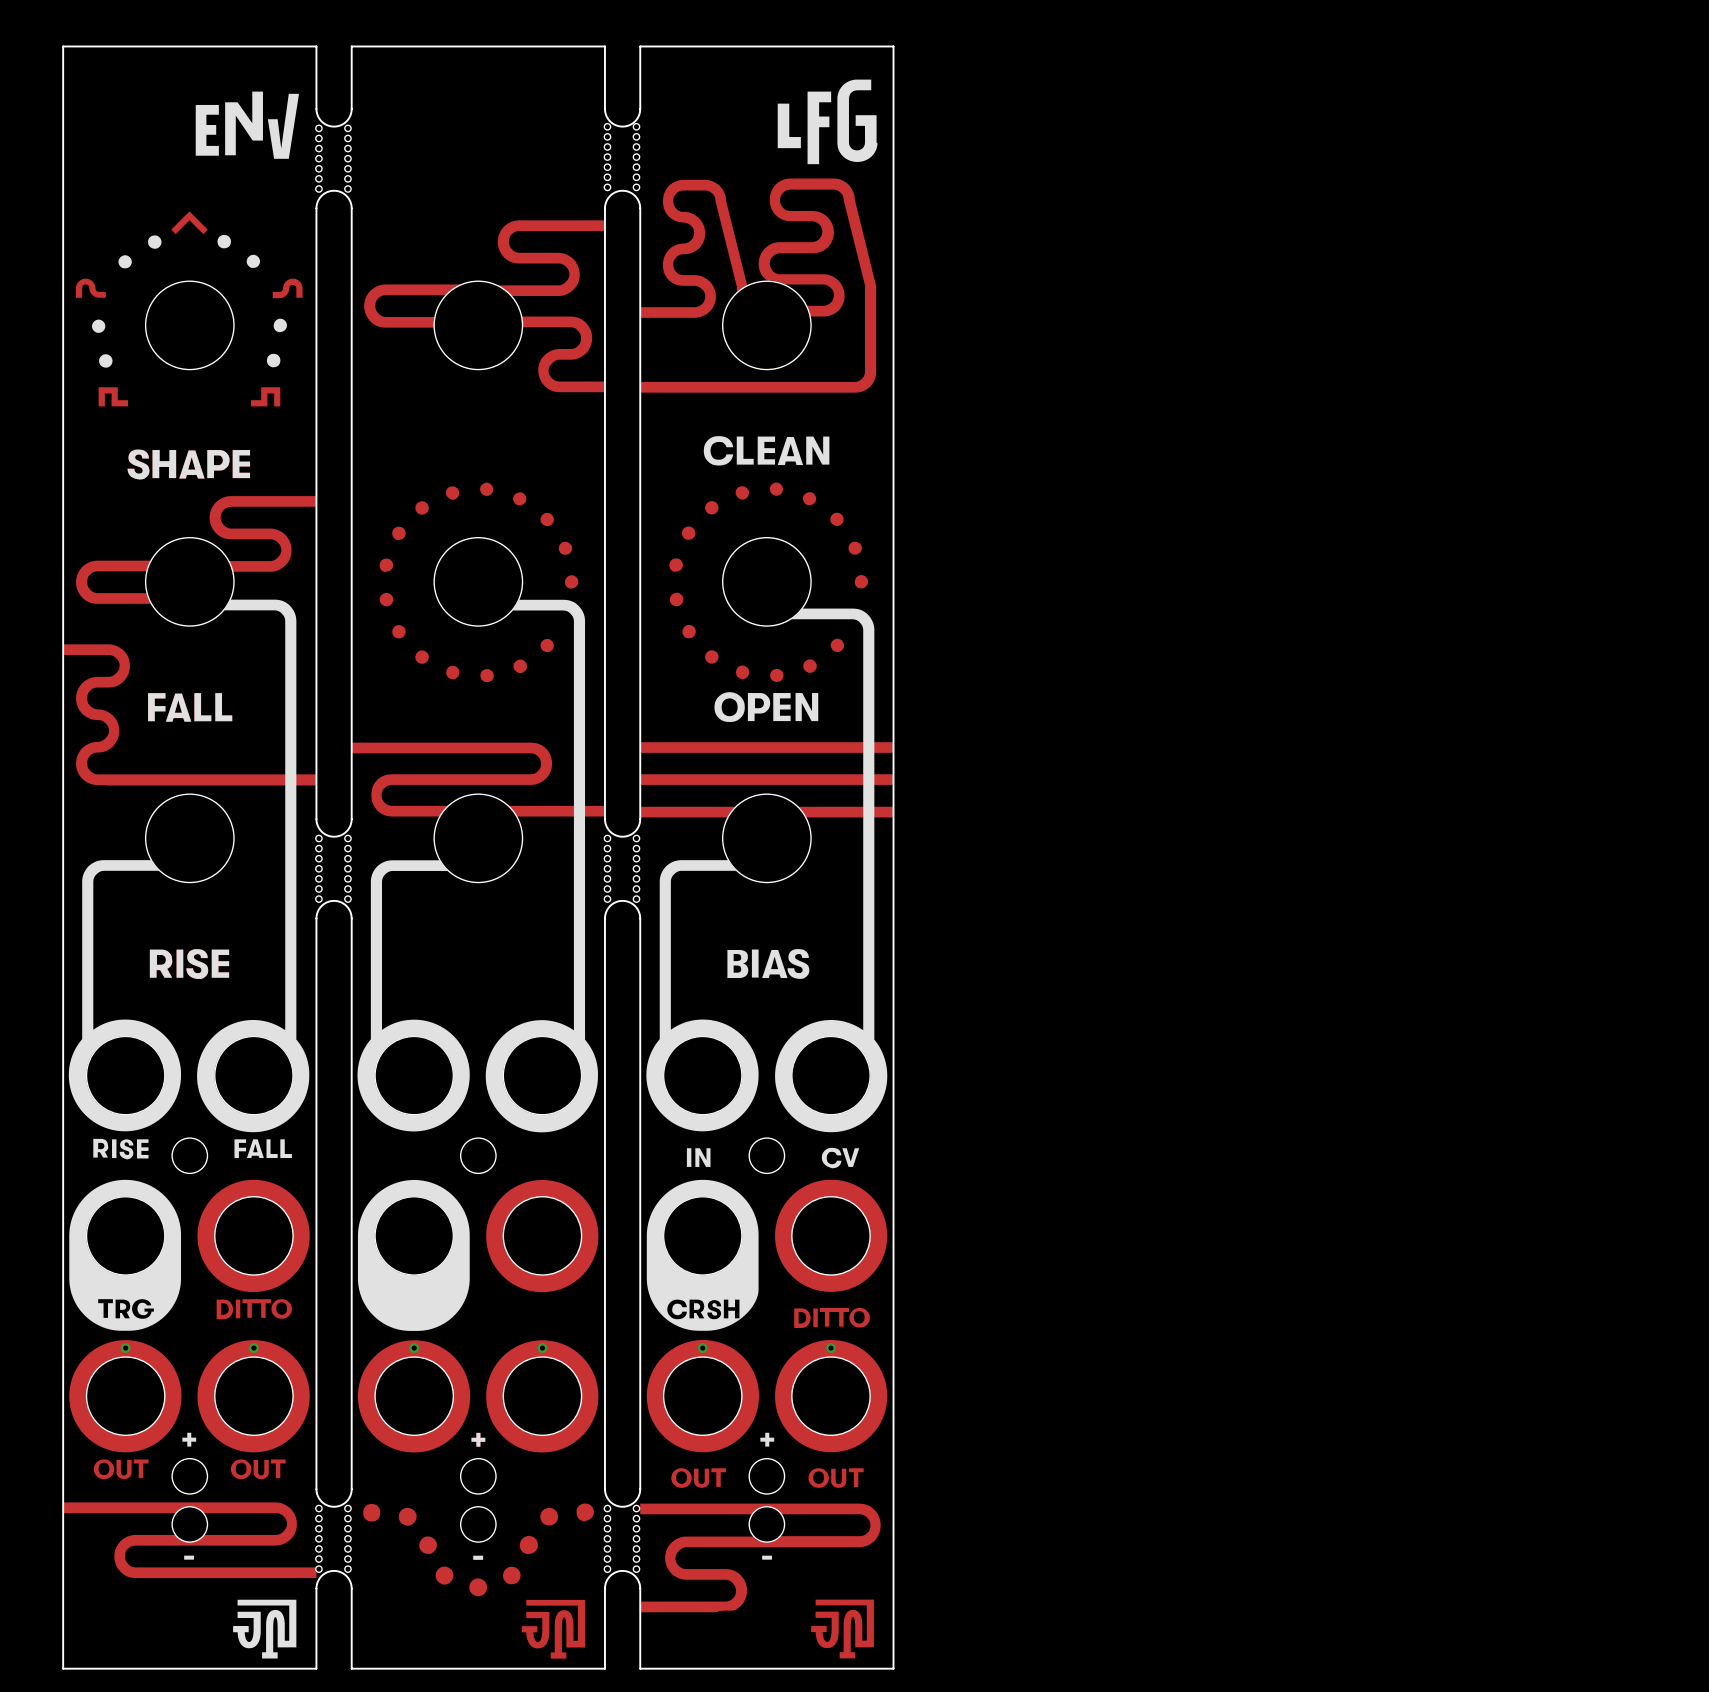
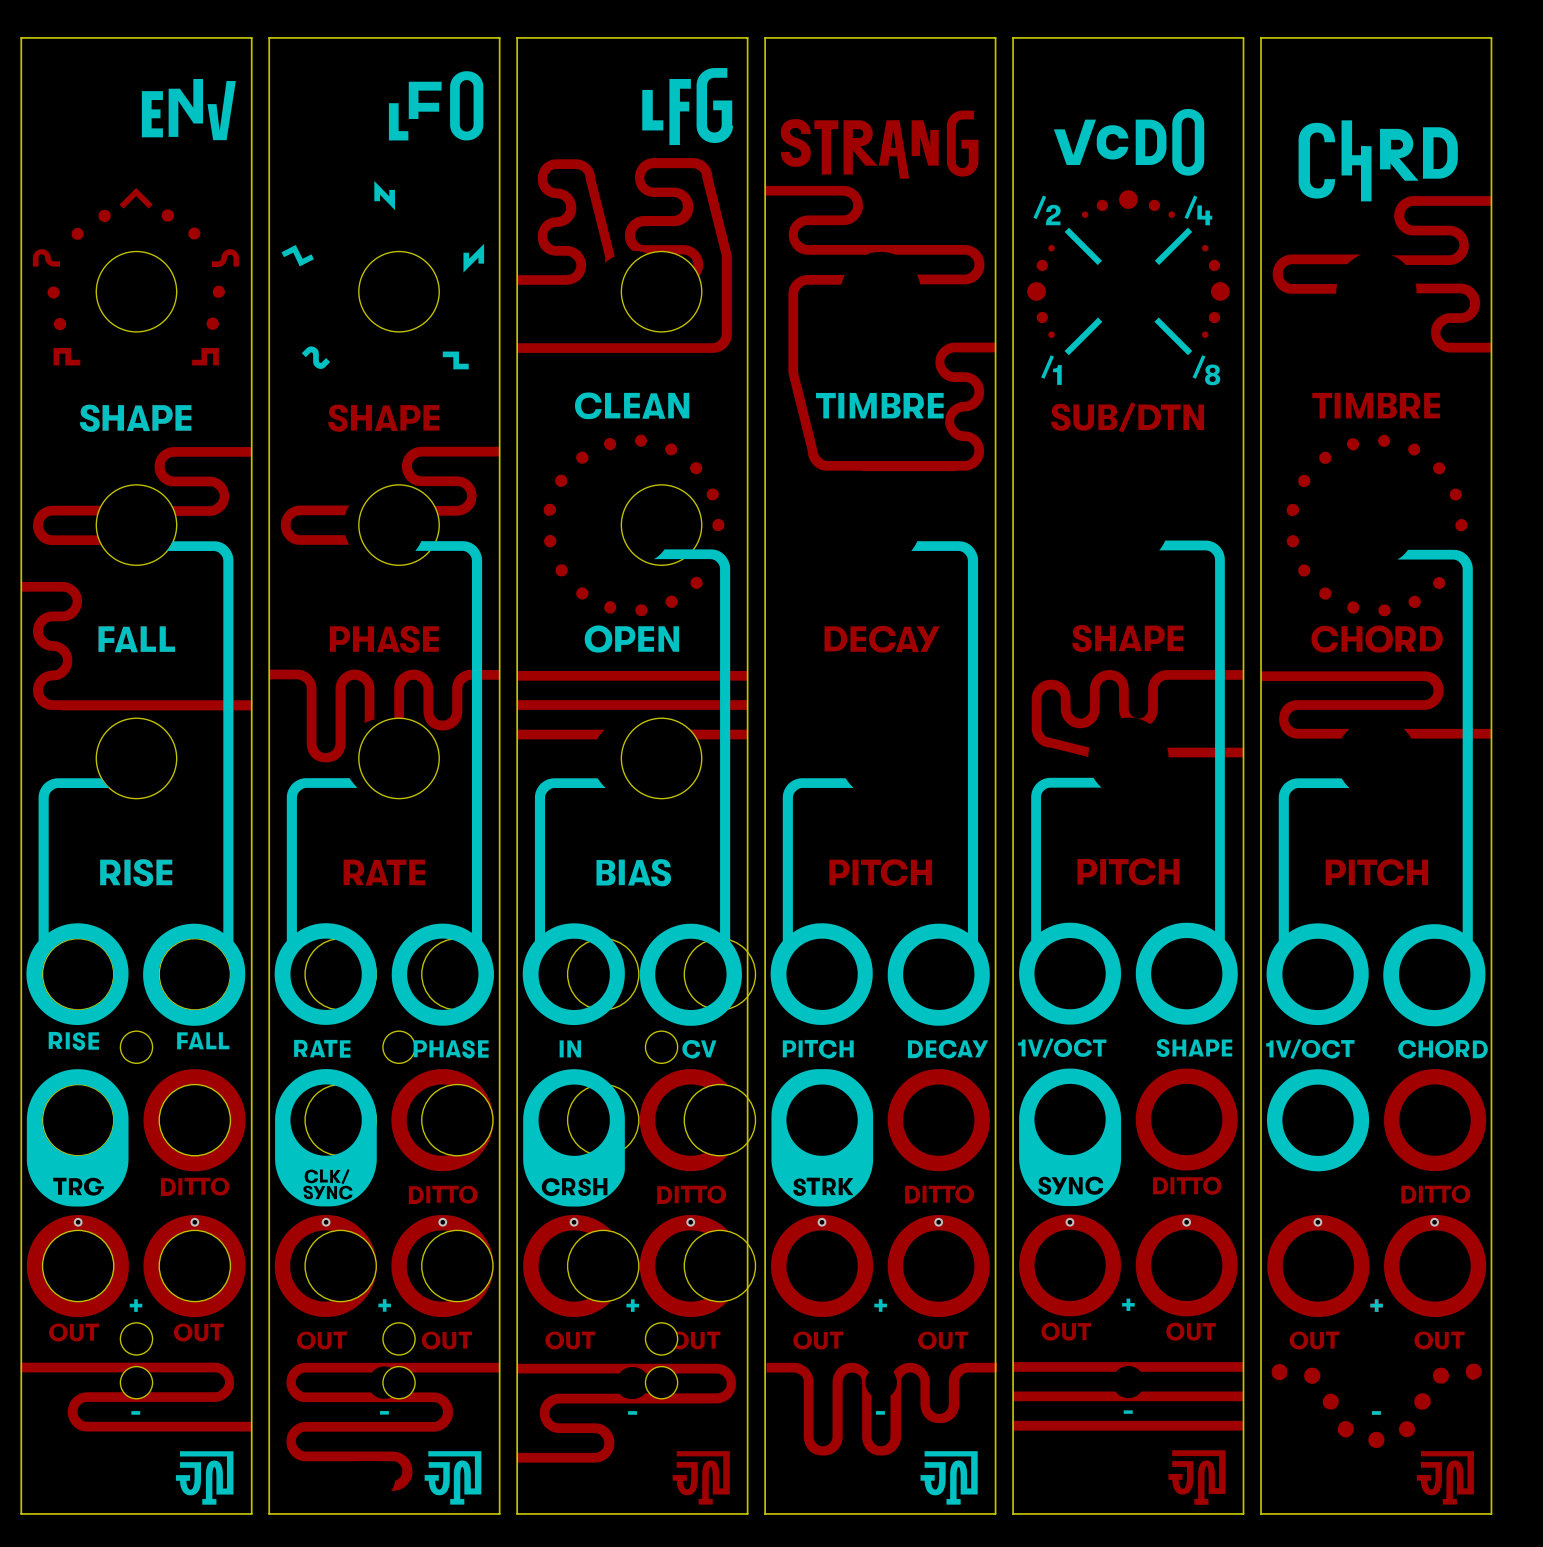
board edge: (351, 46) (351, 108) (349, 117) (340, 125) (329, 126) (320, 119) (316, 108) -> (251, 185) (251, 94)
board edge: none -> (283, 37) (269, 37) (269, 1513) (283, 1513)
board edge: (588, 46) (604, 46) (605, 113) (611, 122) (622, 126) (633, 122) (639, 113) (640, 46) -> (499, 37) (499, 1513)
board edge: (861, 46) (880, 46) -> (747, 37) (747, 1513)
board edge: (893, 46) (893, 1668) -> (776, 37) (995, 37) (995, 1513) (776, 1513)
board edge: none -> (1013, 37) (1243, 37) (1243, 1513) (1013, 1513) (1013, 37)
board edge: none -> (1261, 37) (1491, 37) (1491, 1513) (1261, 1513) (1261, 37)
drawing: none -> [269, 71, 500, 1505]
drawing shape: [62, 91, 317, 1659] -> [20, 78, 253, 1505]
drawing: none -> [1013, 108, 1244, 1505]
drawing: none -> [765, 110, 998, 1505]
drawing: none -> [1260, 120, 1492, 1505]
part: (621, 157) -> none
part: (333, 158) -> none
board edge: (316, 208) (321, 195) (334, 190) (346, 195) (351, 208) (351, 819) (346, 831) (334, 836) (321, 831) (316, 819) -> none
board edge: (604, 208) (604, 819) (610, 831) (622, 836) (635, 831) (640, 819) (640, 208) (635, 195) (622, 190) (610, 195) (604, 208) -> none
drawing: [351, 220, 606, 1659] -> none
part: (333, 868) -> none
part: (621, 868) -> none
drawing position: (766, 868) -> (632, 786)
board edge: (316, 918) (321, 906) (334, 900) (346, 906) (351, 918) (351, 1489) (346, 1501) (334, 1506) (321, 1501) (316, 1489) -> (251, 831) (251, 740)
board edge: (604, 918) (604, 1489) (610, 1501) (622, 1506) (635, 1501) (640, 1489) (640, 918) (635, 906) (622, 900) (610, 906) (604, 918) -> none
via position: (414, 1348) -> (326, 1222)
via position: (542, 1348) -> (442, 1222)
via position: (702, 1348) -> (574, 1222)
via position: (831, 1348) -> (690, 1222)
via: none -> (822, 1222)
via: none -> (938, 1222)
via: none -> (1069, 1222)
via: none -> (1186, 1222)
via: none -> (1317, 1222)
via: none -> (1434, 1222)
part: (333, 1538) -> none
part: (621, 1538) -> none
board edge: (316, 1588) (320, 1577) (329, 1571) (340, 1572) (350, 1581) (351, 1668) -> (251, 1441) (251, 1350)
board edge: (588, 1668) (604, 1668) (605, 1586) (611, 1574) (622, 1570) (633, 1574) (640, 1586) (640, 1668) -> (546, 37) (517, 37) (517, 1513) (546, 1513)
board edge: (861, 1668) (880, 1668) -> (765, 37) (765, 1513)

